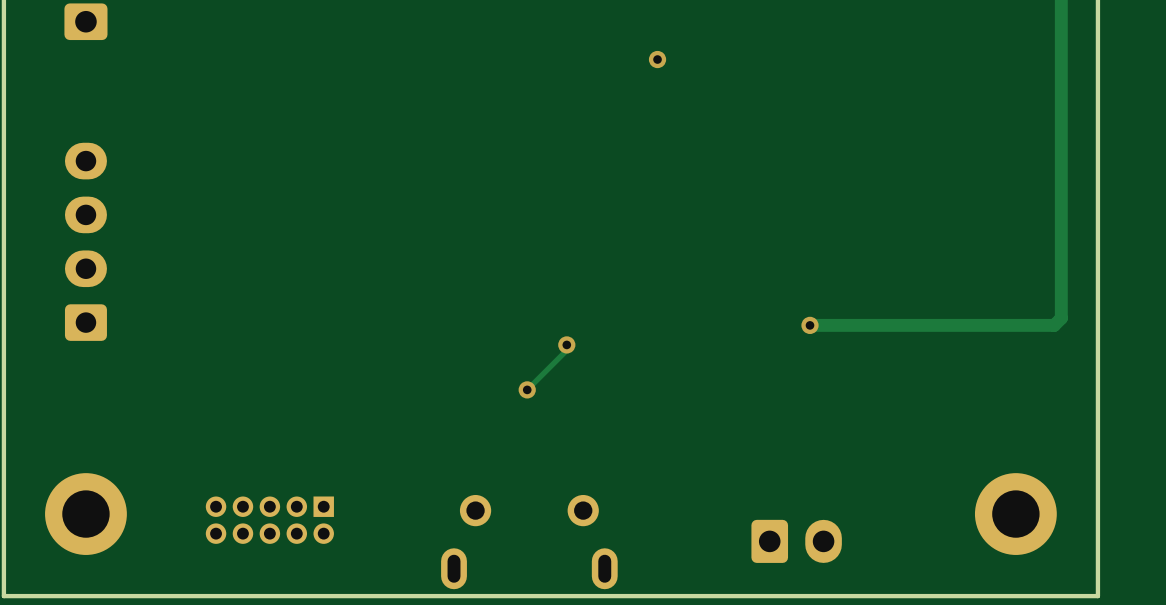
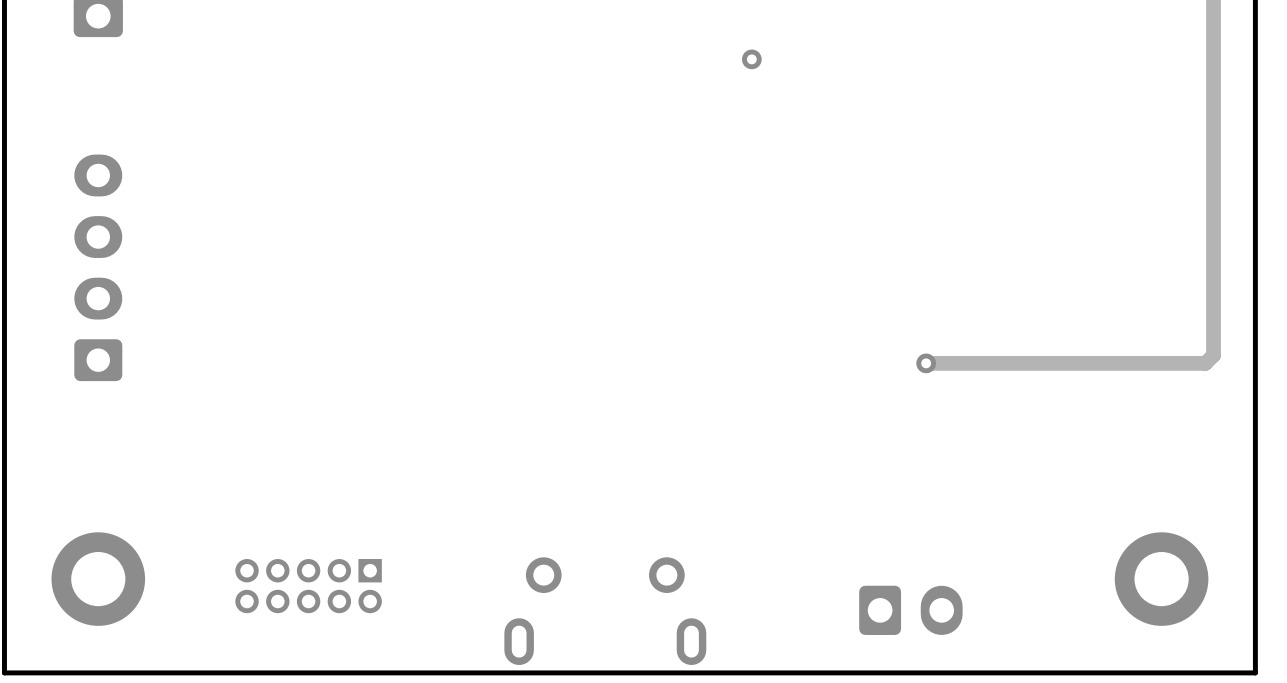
track: (566, 344) (566, 350) (527, 389) -> none
via: (566, 344) -> none
via: (527, 389) -> none

